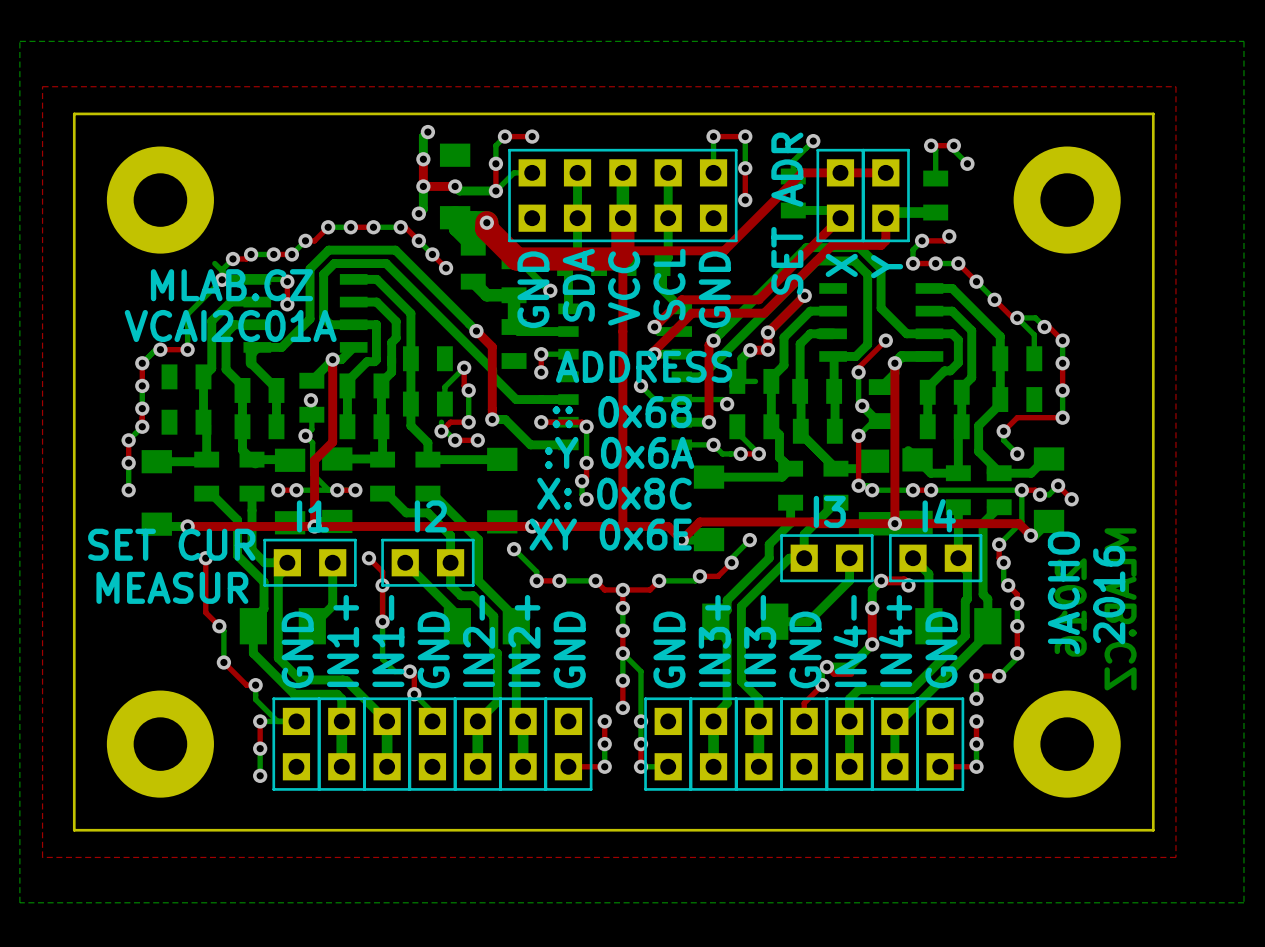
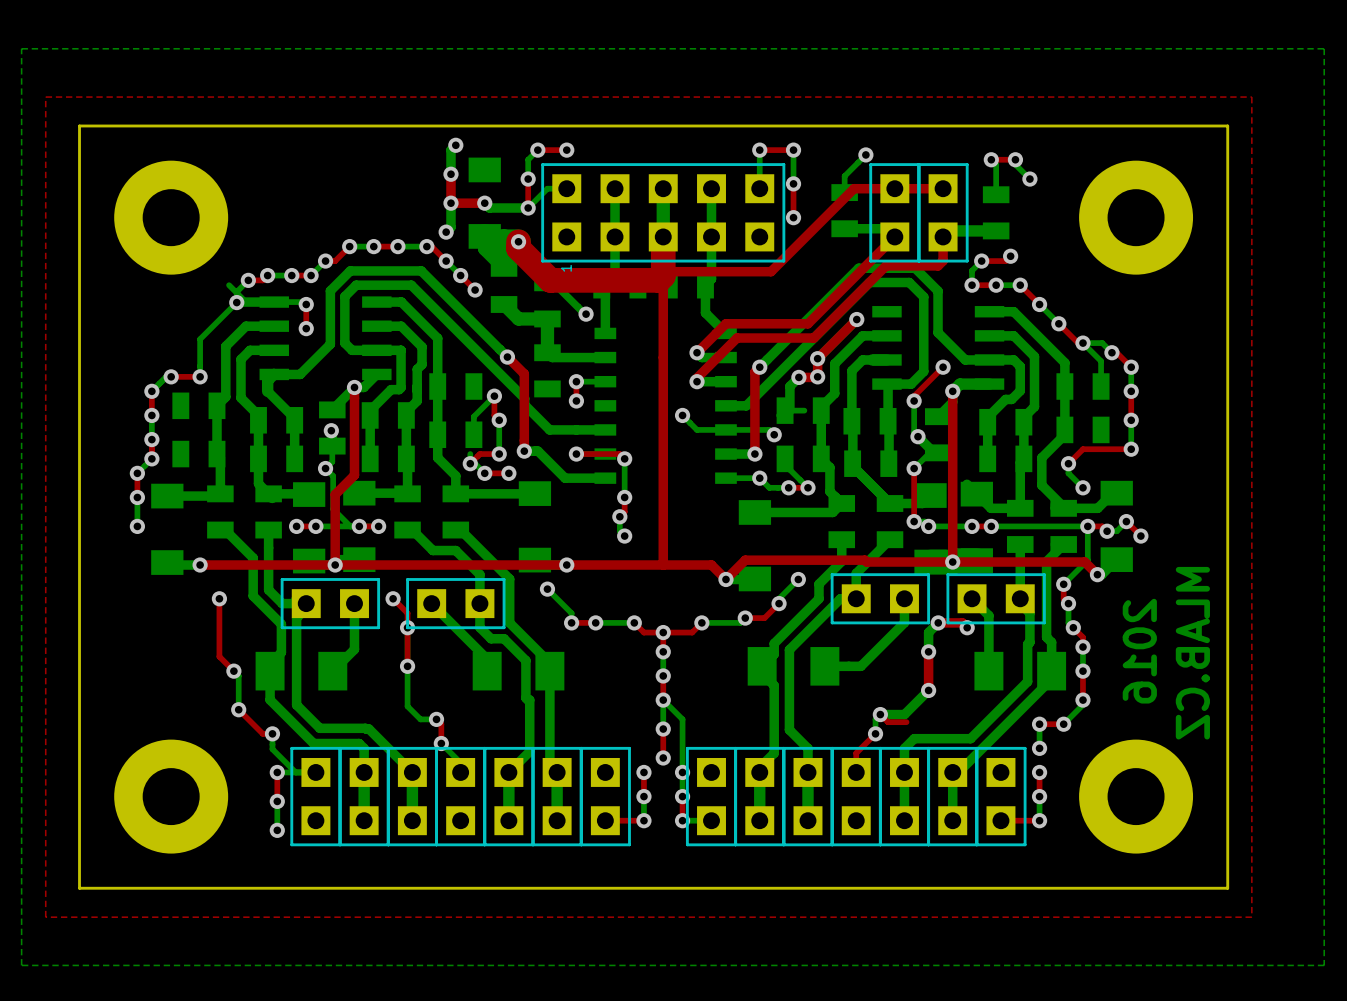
text: SET ADR (787, 213) -> none
part text: none -> 1 (566, 268)
text: X (841, 265) -> none
text: Y (887, 266) -> none
text: SCL (669, 284) -> none
text: MLAB.CZ (231, 285) -> none
text: SDA (578, 285) -> none
text: VCC (624, 288) -> none
text: GND (533, 289) -> none
text: GND (714, 289) -> none
text: VCAI2C01A (230, 326) -> none
text: ADDRESS (644, 366) -> none
text: :: 0x68 (622, 412) -> none
text: :Y 0x6A (619, 452) -> none
text: X: 0x8C (614, 493) -> none
text: I3 (829, 511) -> none
text: I4 (939, 515) -> none
text: I1 (312, 516) -> none
text: I2 (430, 516) -> none
text: XY 0x6E (610, 534) -> none
text: SET CUR (171, 544) -> none
text: MEASUR (172, 587) -> none
text: JACHO (1063, 592) -> none
text: 2016 (1109, 595) -> none
text: IN1+ (343, 640) -> none
text: IN1- (388, 640) -> none
text: IN2- (479, 640) -> none
text: IN2+ (524, 640) -> none
text: IN3+ (714, 640) -> none
text: IN3- (760, 640) -> none
text: IN4- (850, 640) -> none
text: IN4+ (895, 640) -> none
text: GND (297, 649) -> none
text: GND (433, 649) -> none
text: GND (569, 649) -> none
text: GND (669, 649) -> none
text: GND (805, 649) -> none
text: GND (941, 649) -> none

